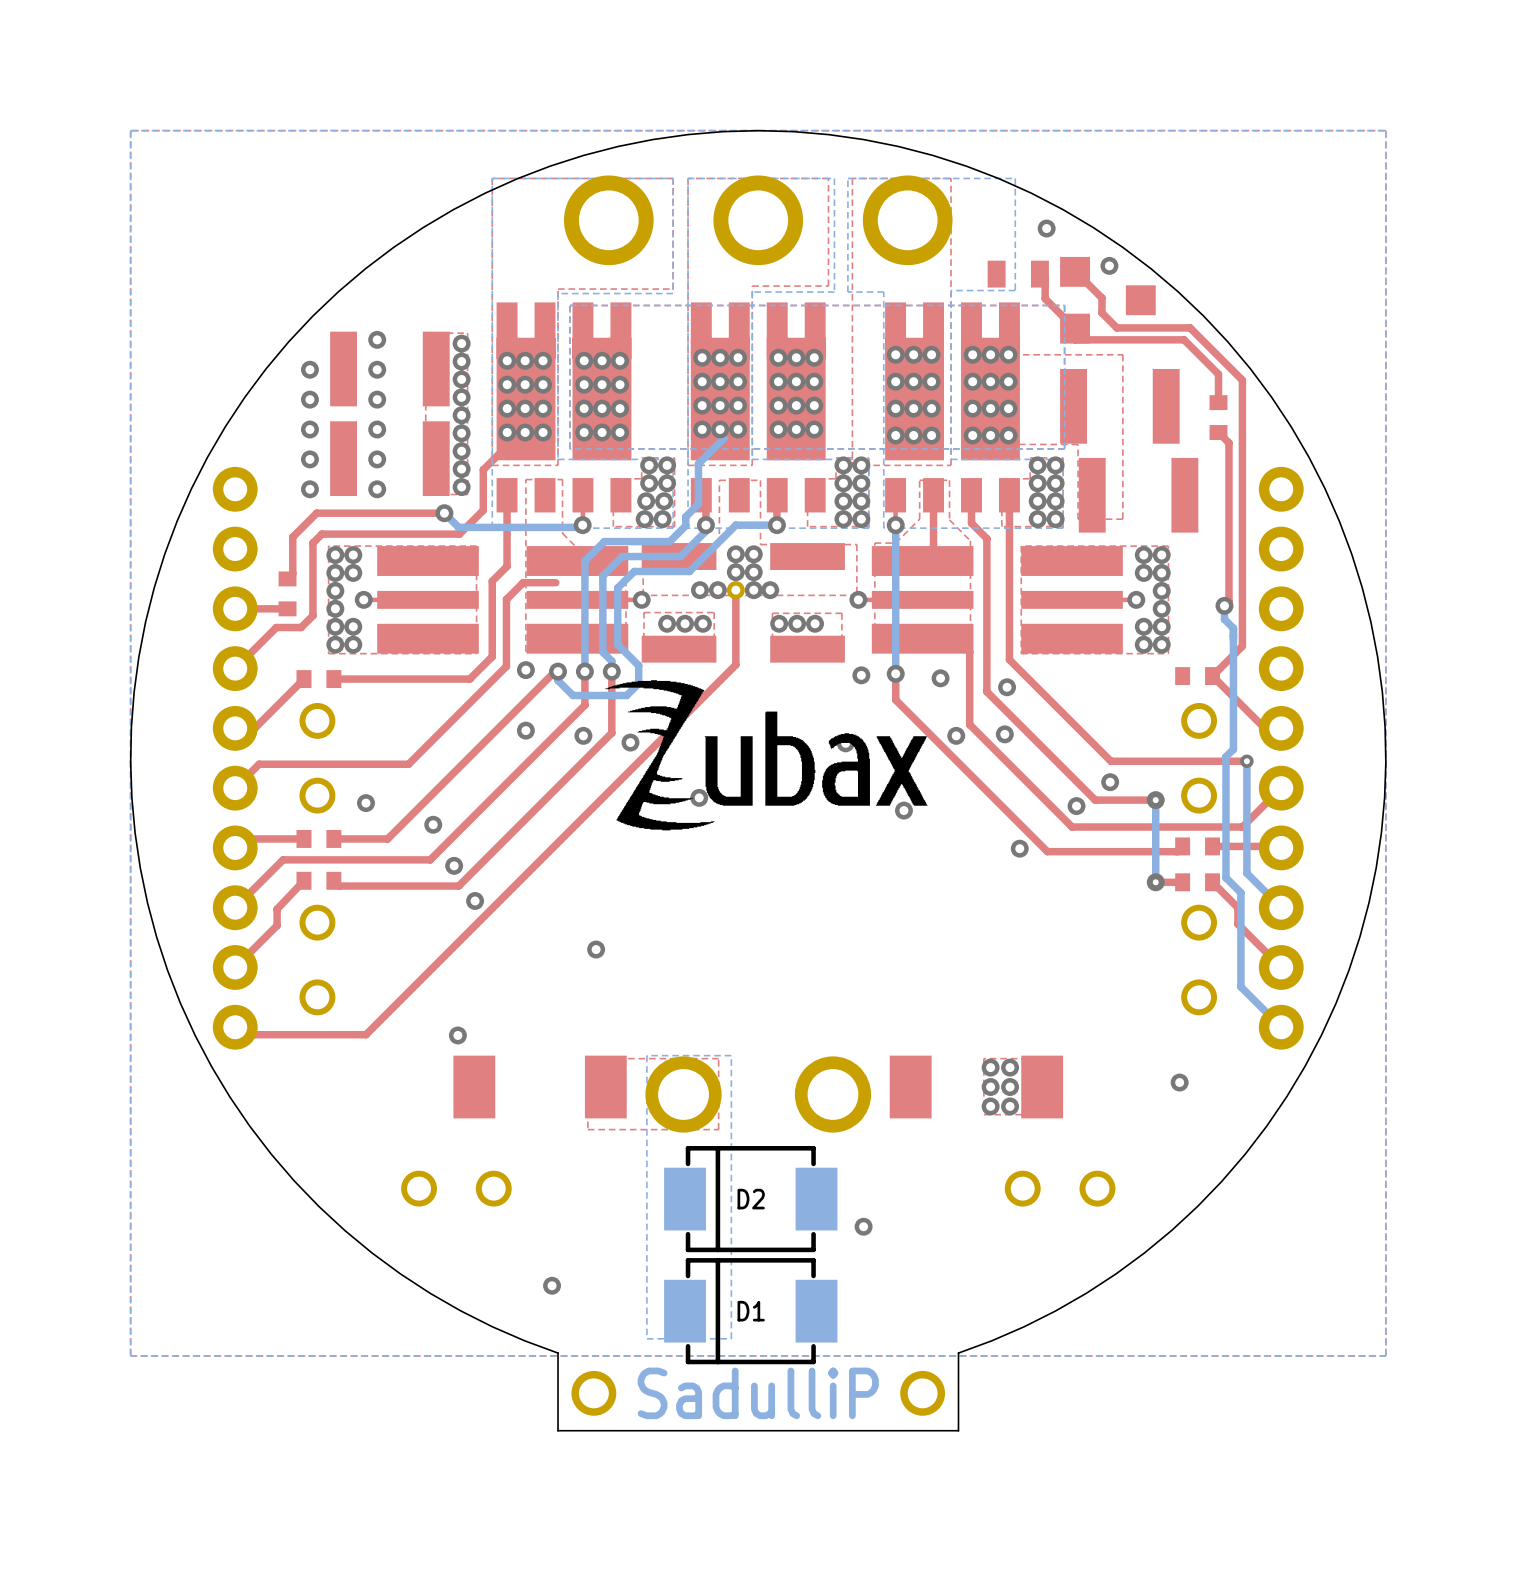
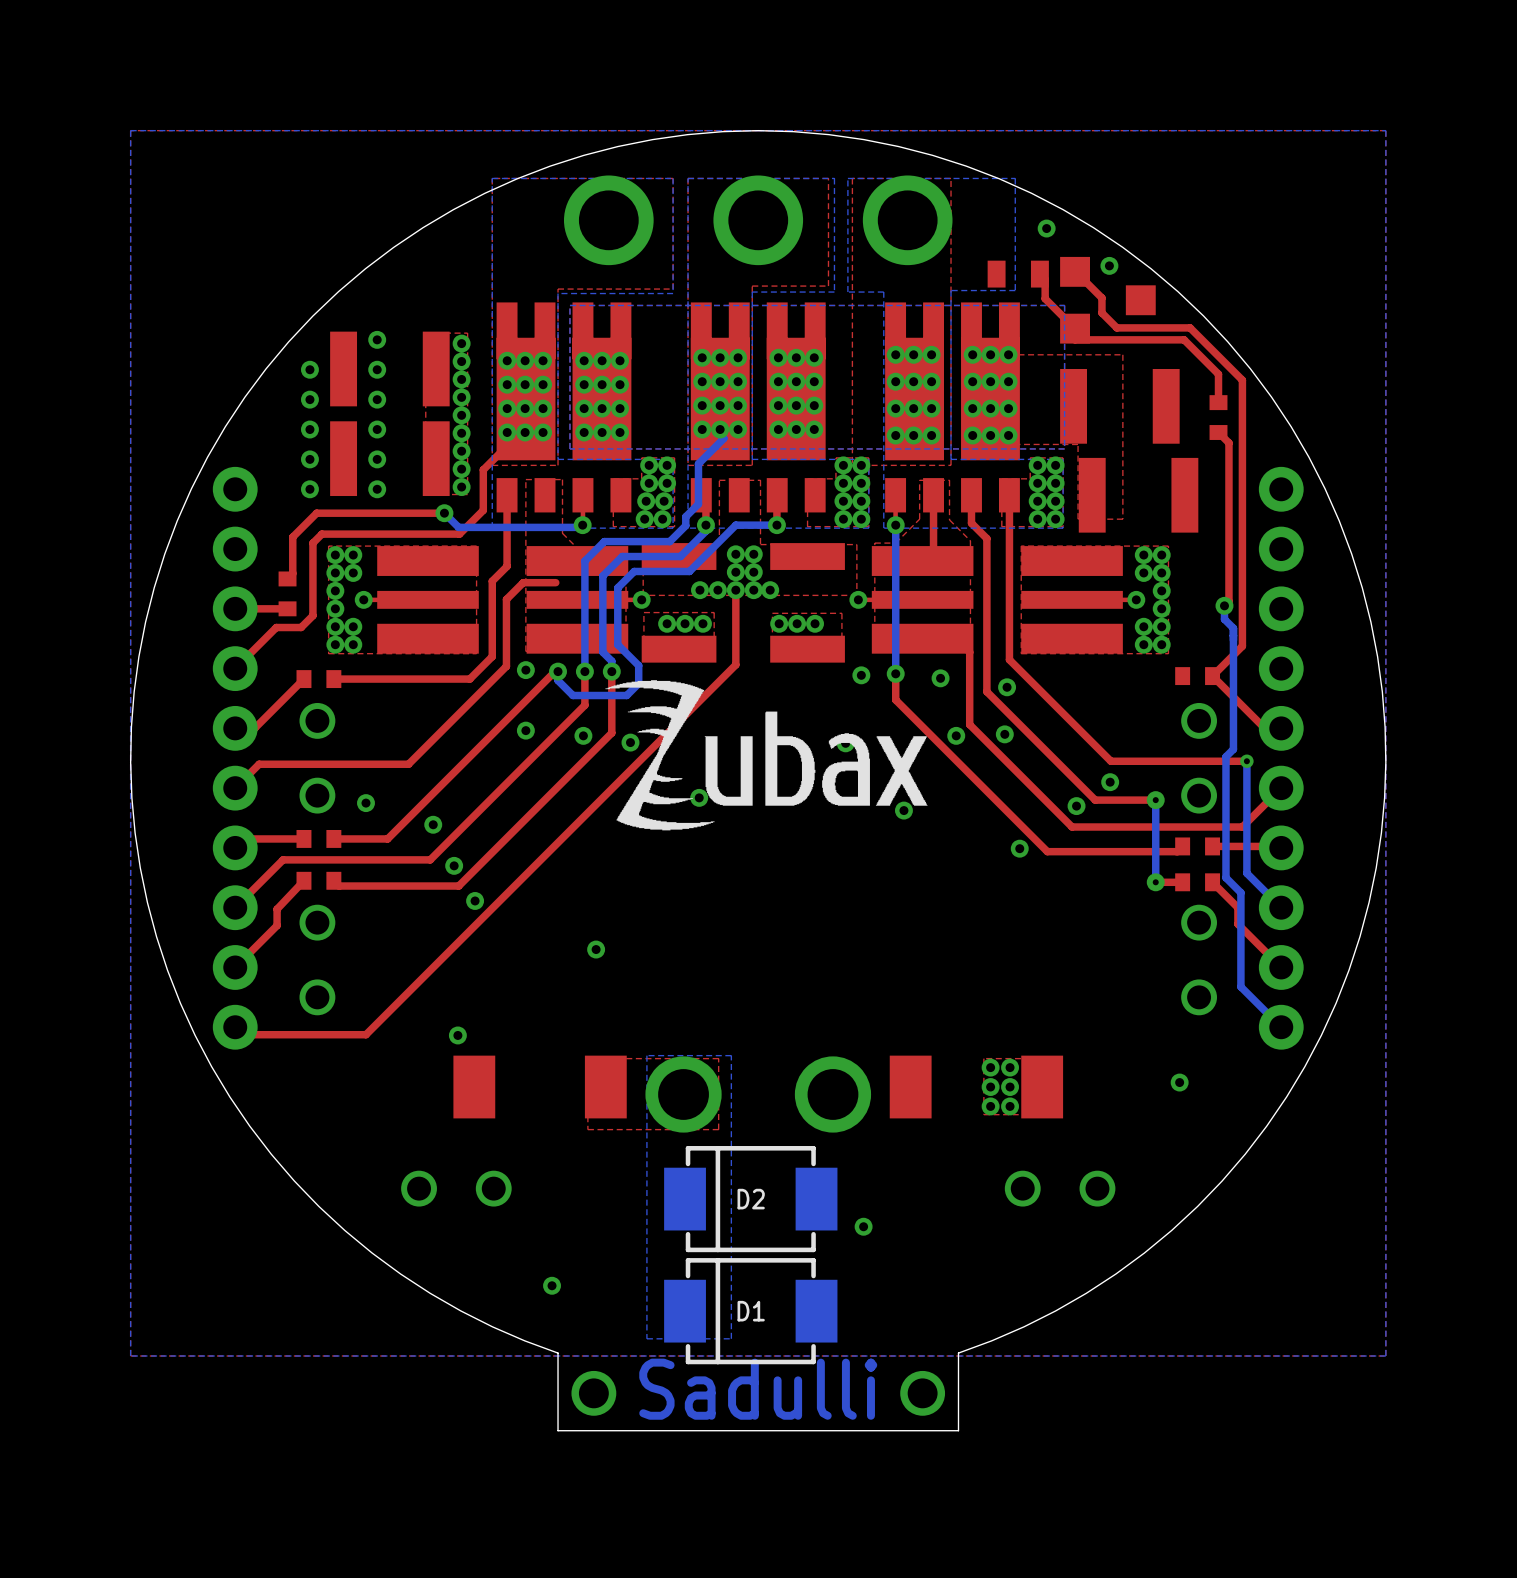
text: SadulliP (758, 1393) -> Sadulli (758, 1389)

